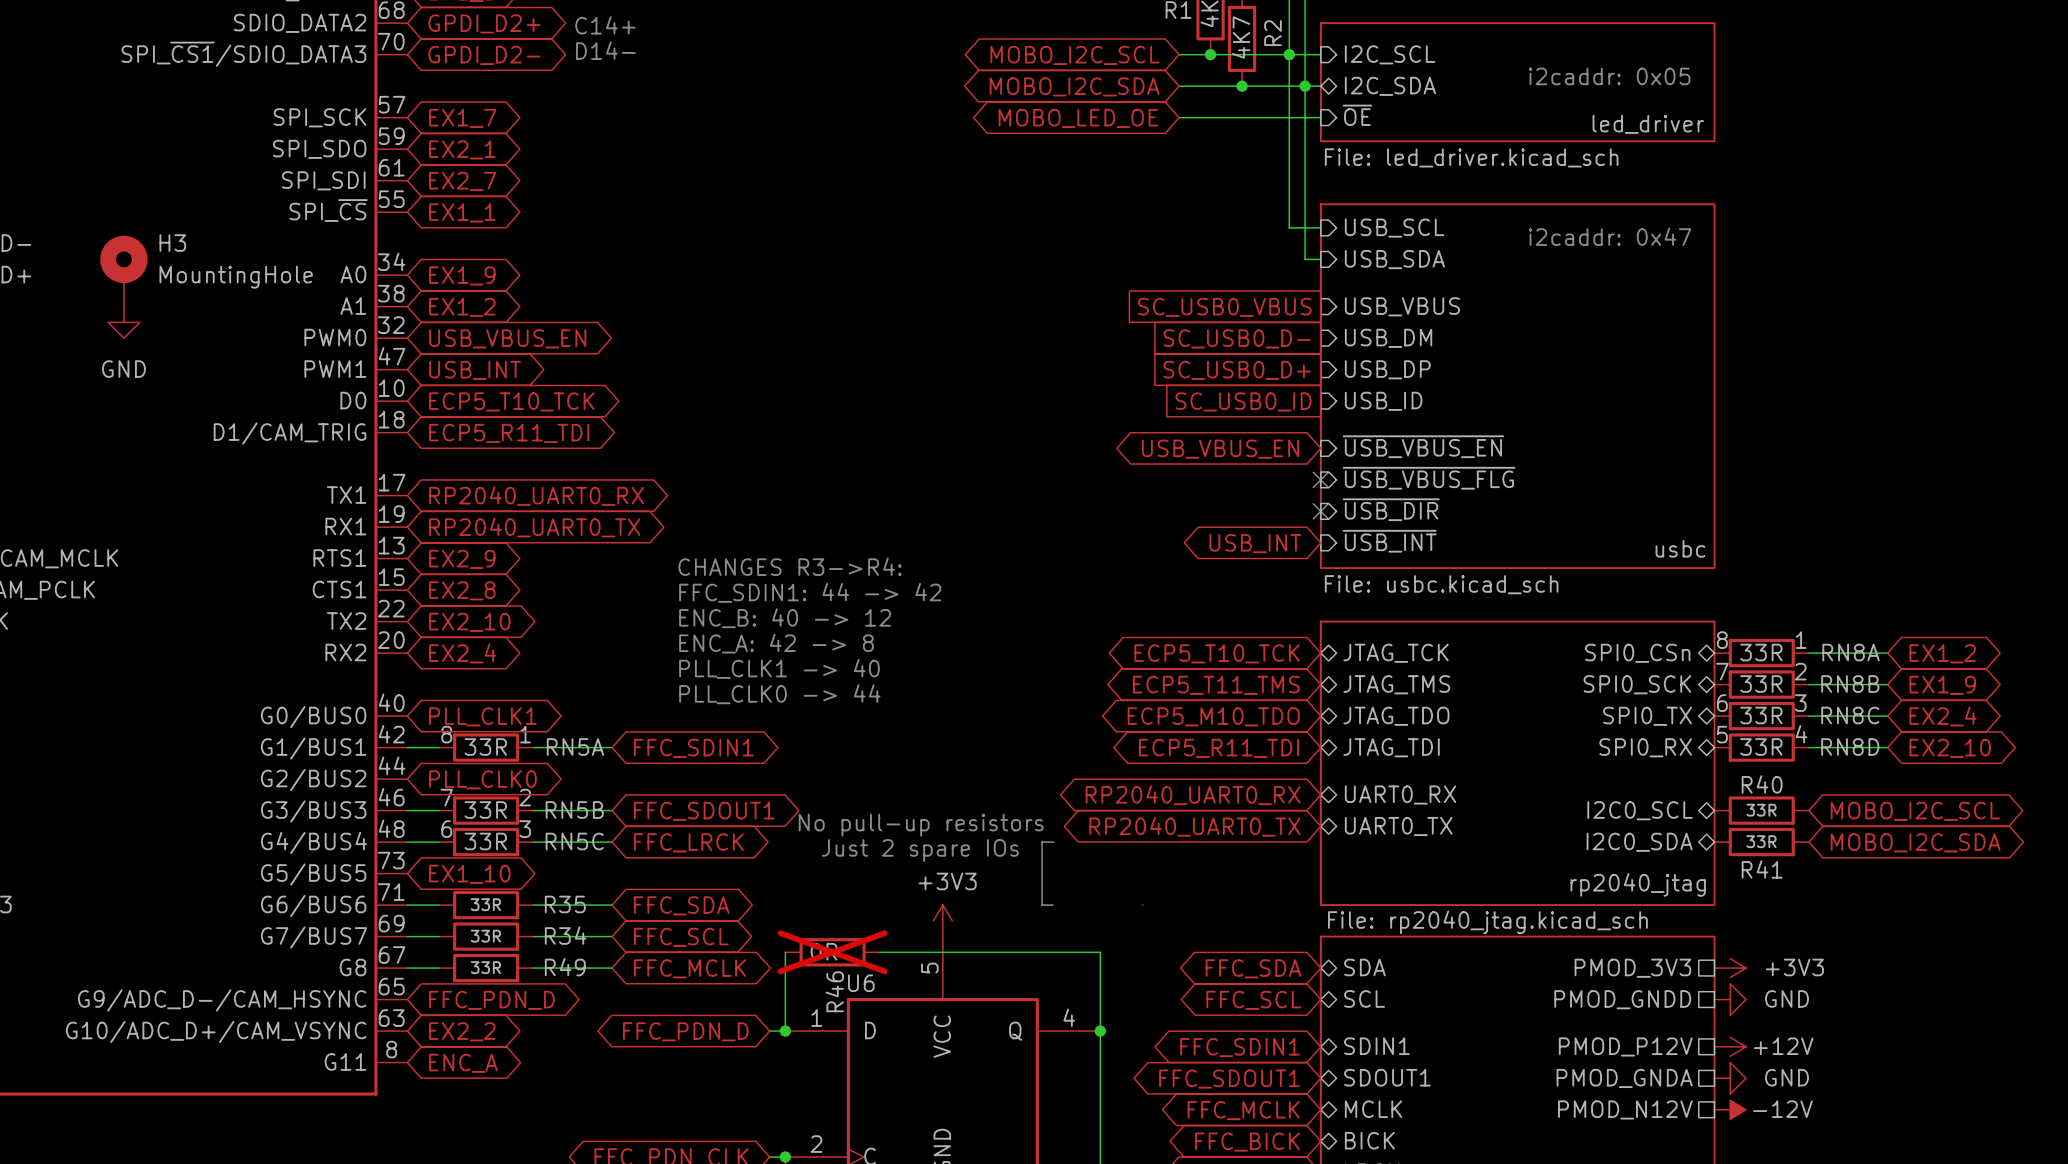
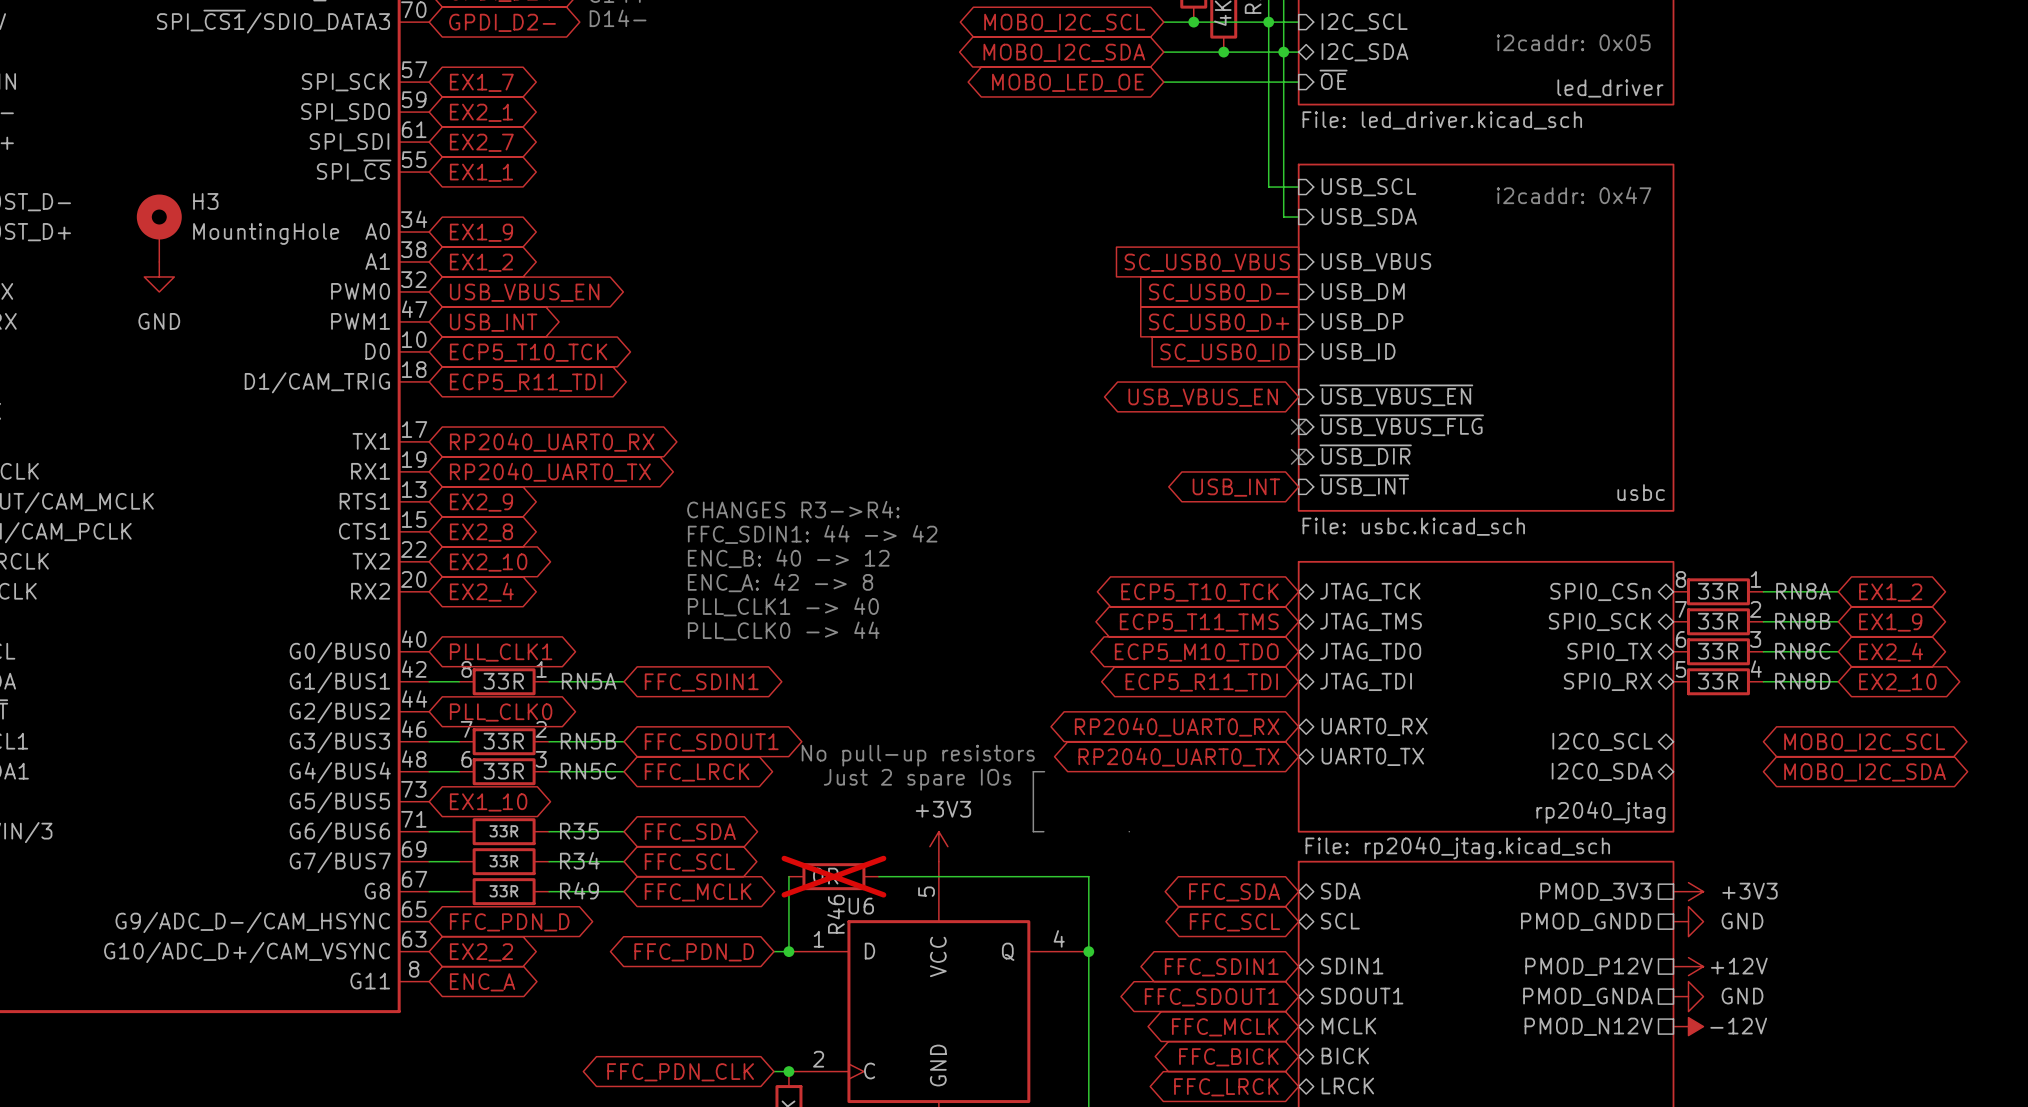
R40: 33R (1761, 810) -> none
R41: 33R (1761, 842) -> none

